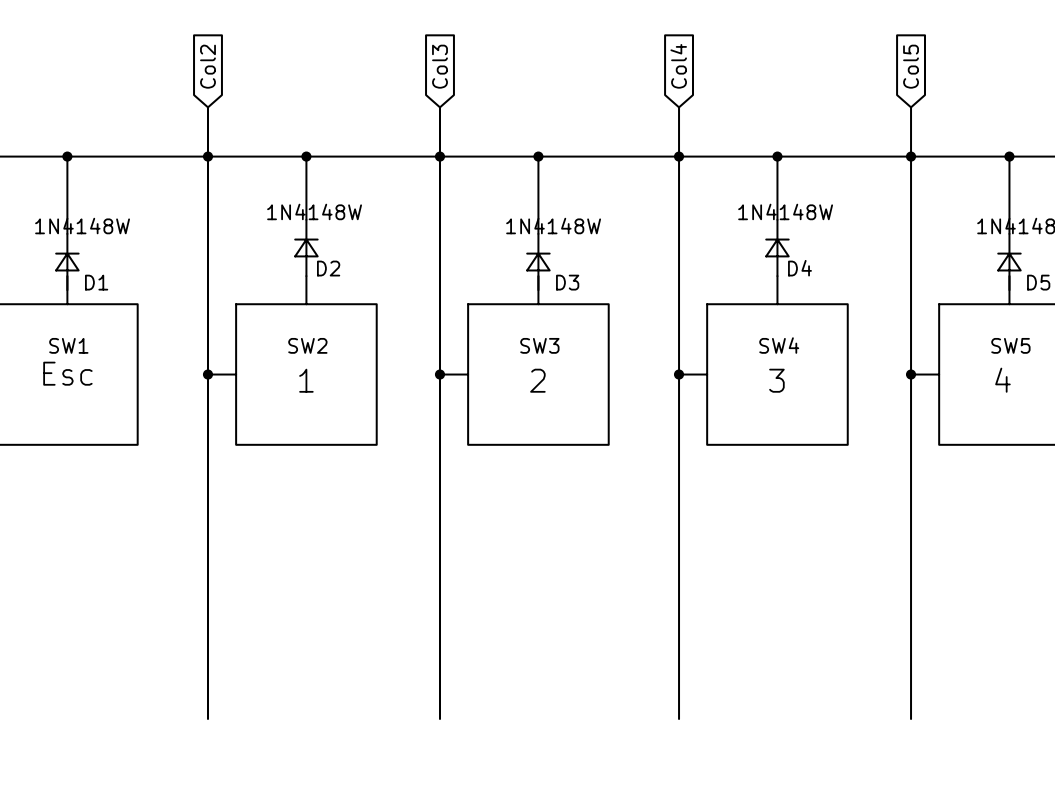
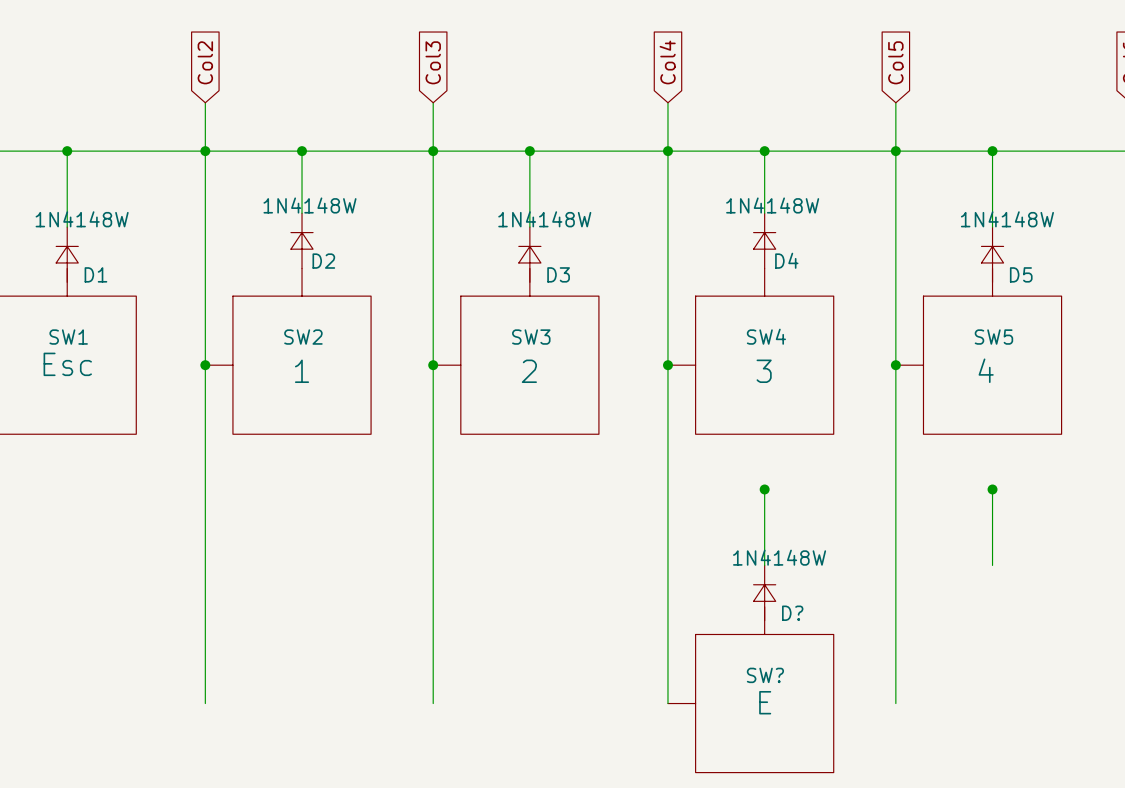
wire: none -> (764, 489) (764, 565)
junction: none -> (764, 489)
wire: none -> (992, 489) (992, 565)
junction: none -> (992, 489)
D?: none -> 1N4148W (764, 593)
SW?: none -> E (750, 689)

